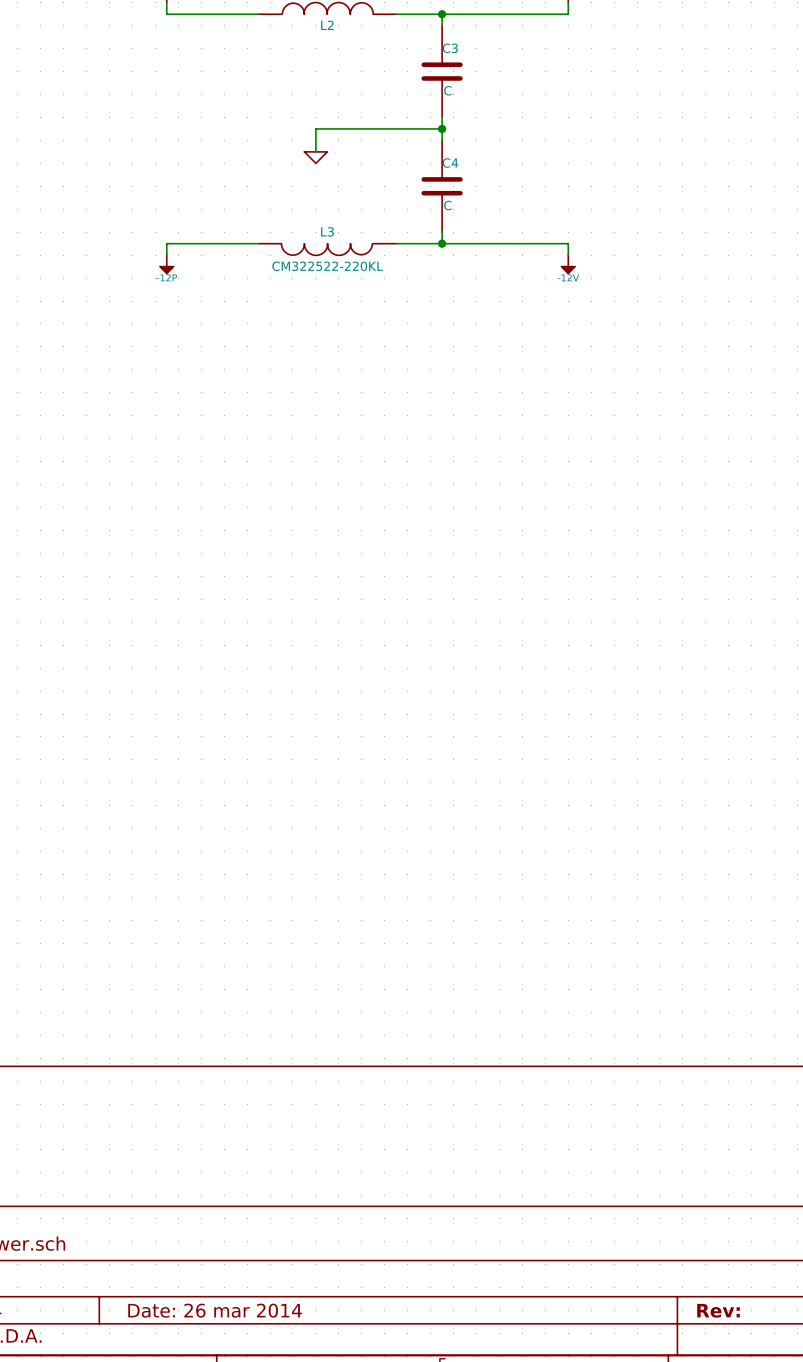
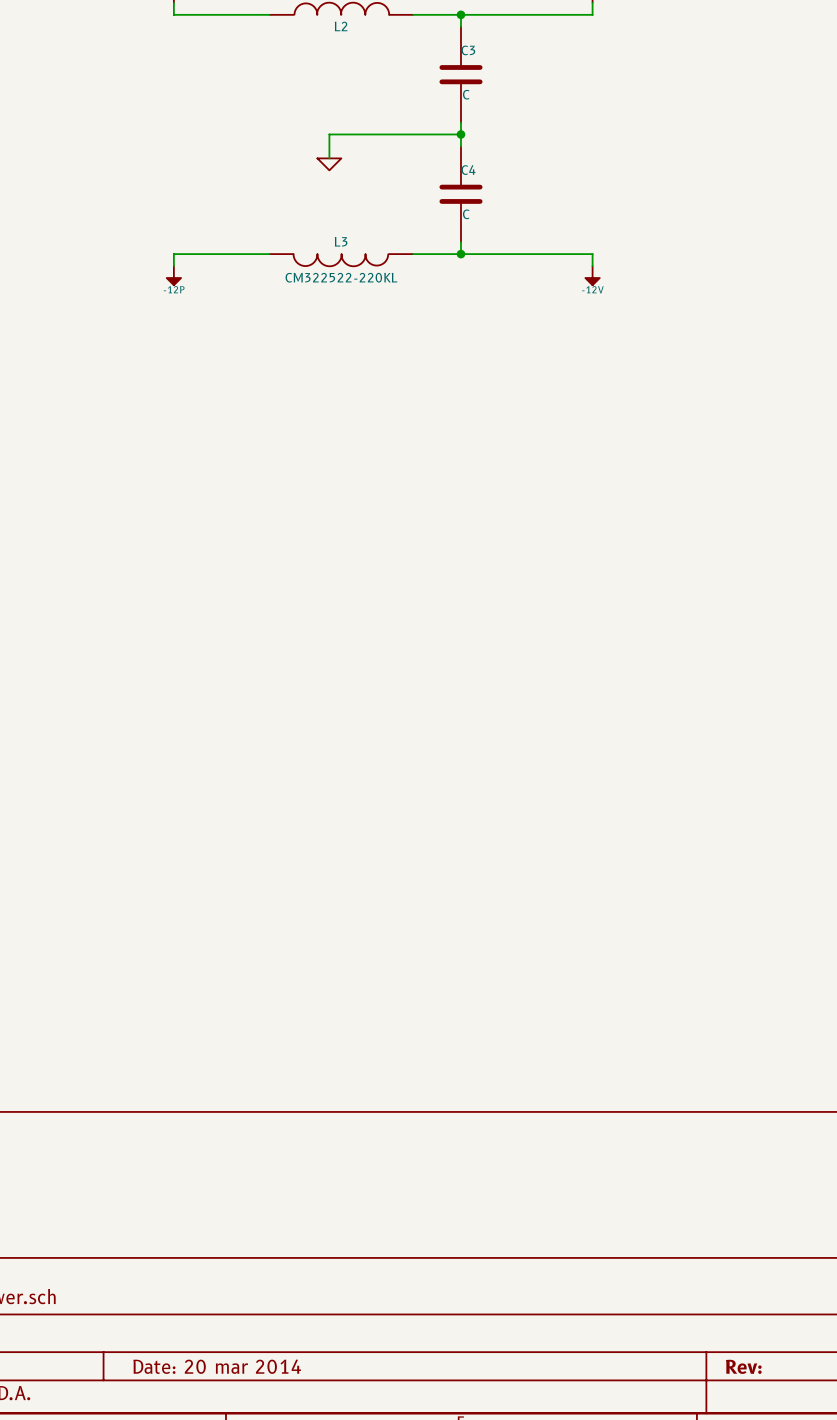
title block: Date: 26 mar 2014 (215, 1310) -> Date: 20 mar 2014 (217, 1366)

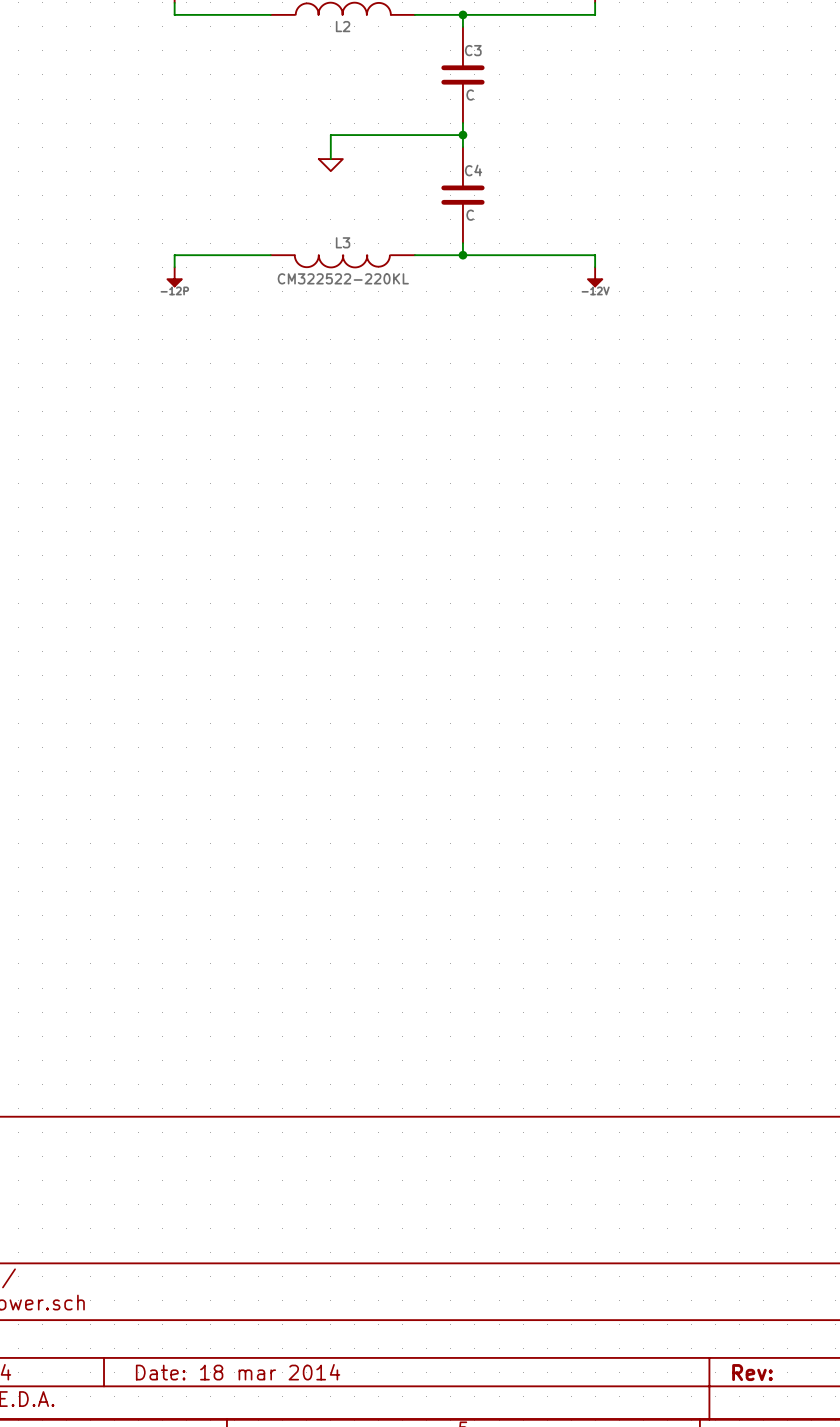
title block: Date: 20 mar 2014 (217, 1366) -> Date: 18 mar 2014 (238, 1372)

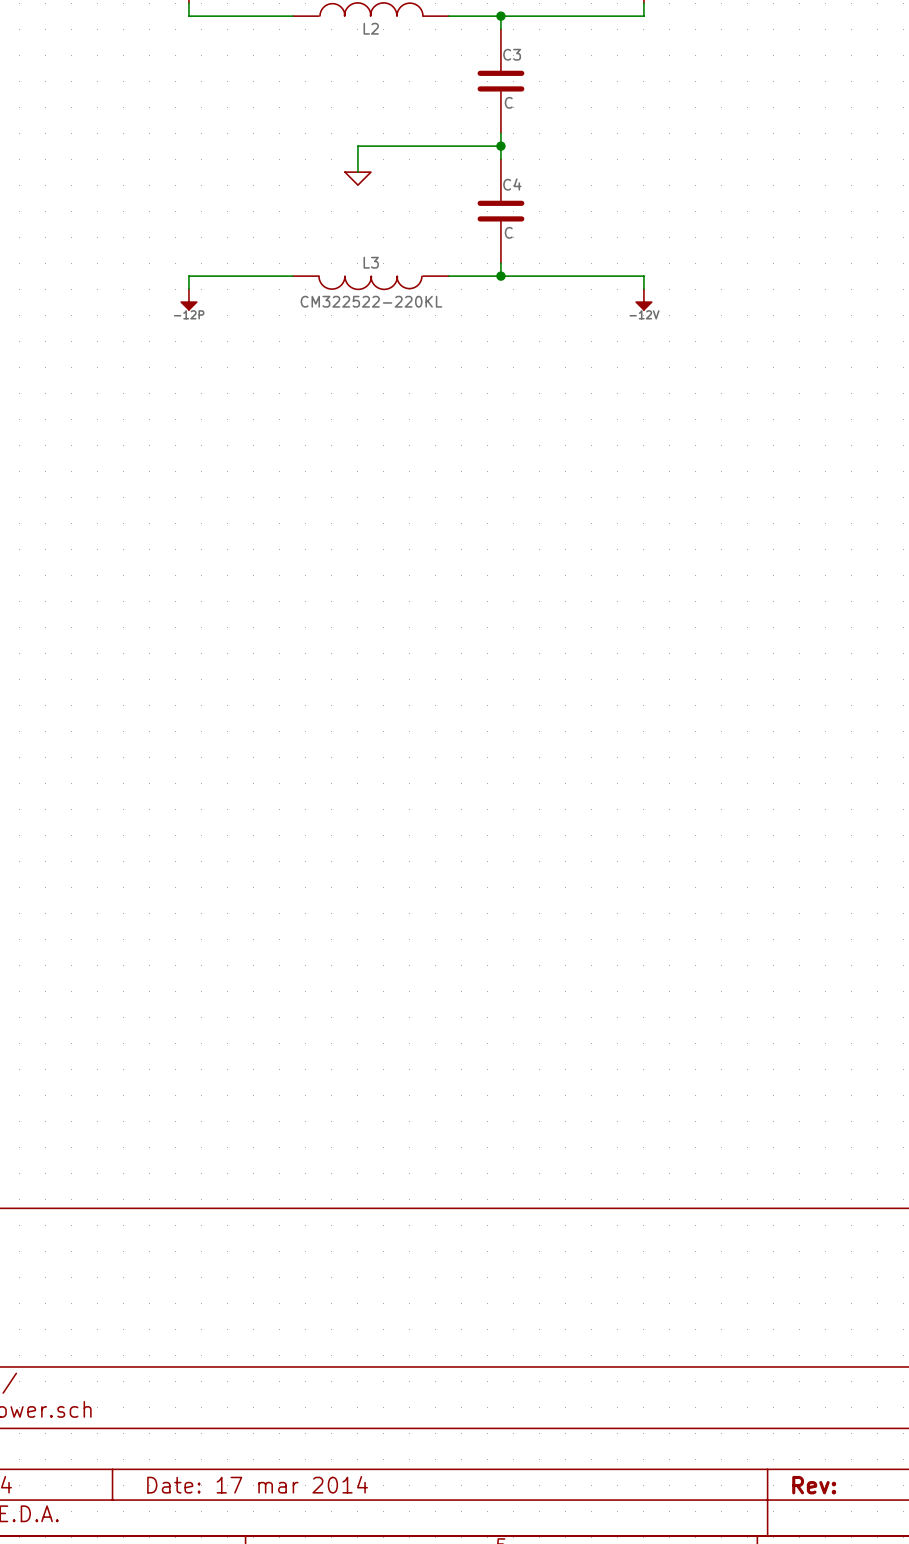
title block: Date: 18 mar 2014 (238, 1372) -> Date: 17 mar 2014 (257, 1484)

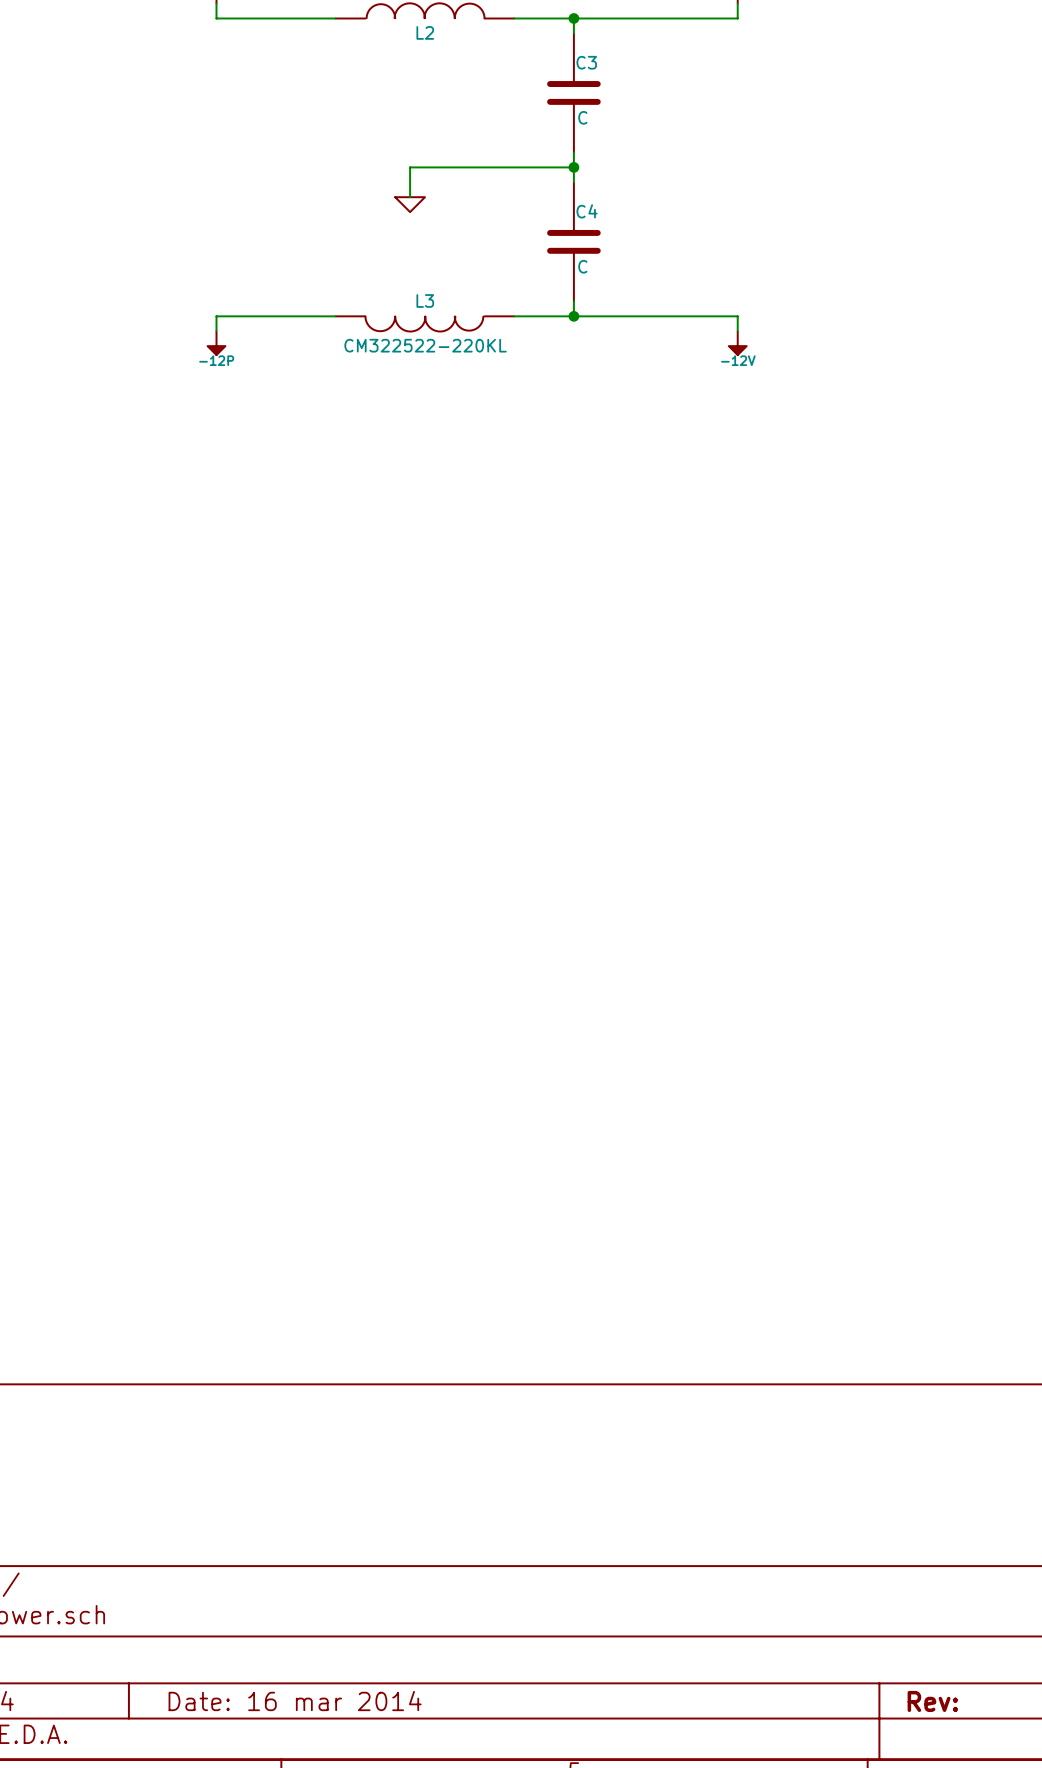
title block: Date: 17 mar 2014 (257, 1484) -> Date: 16 mar 2014 (295, 1701)

